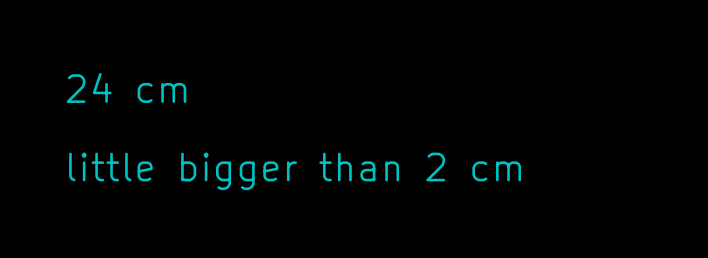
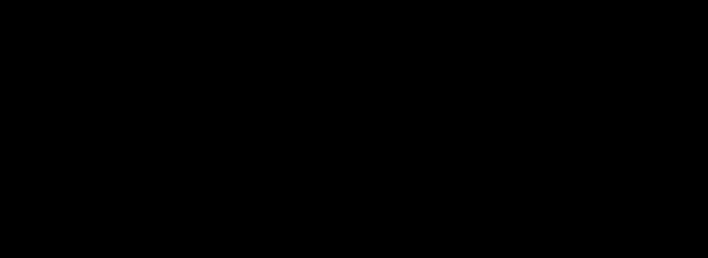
text: 24 cm (126, 87) -> none
text: little bigger than 2 cm (295, 171) -> none

